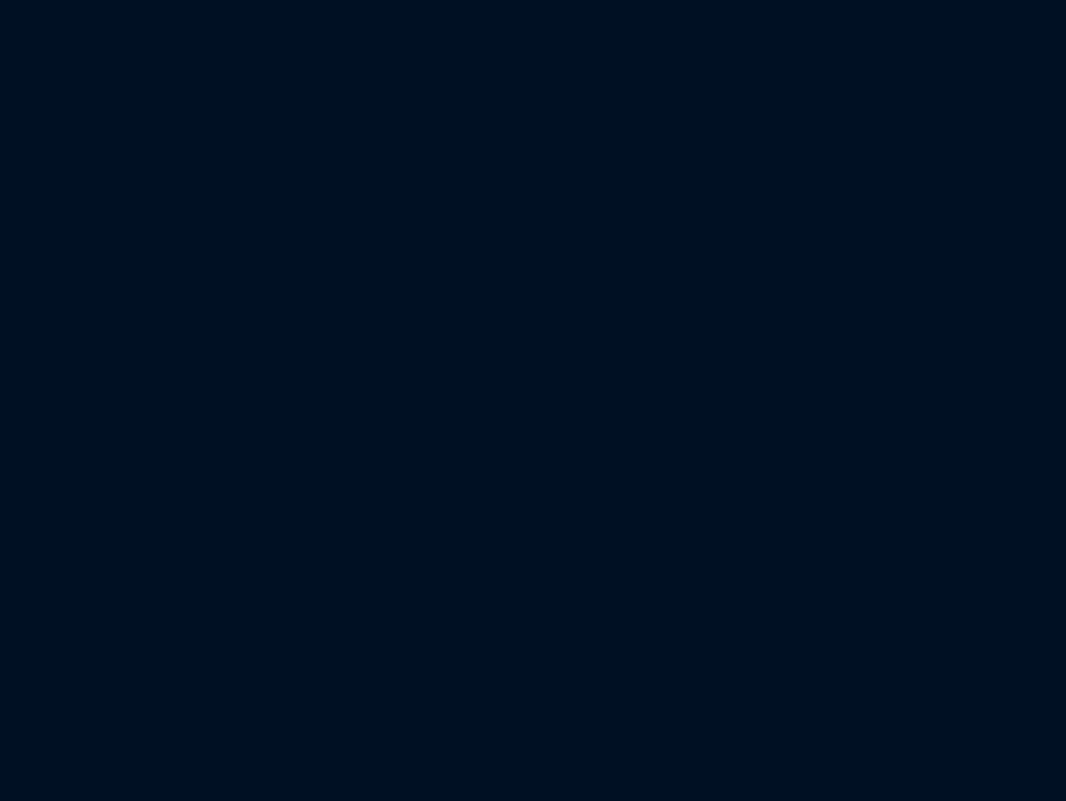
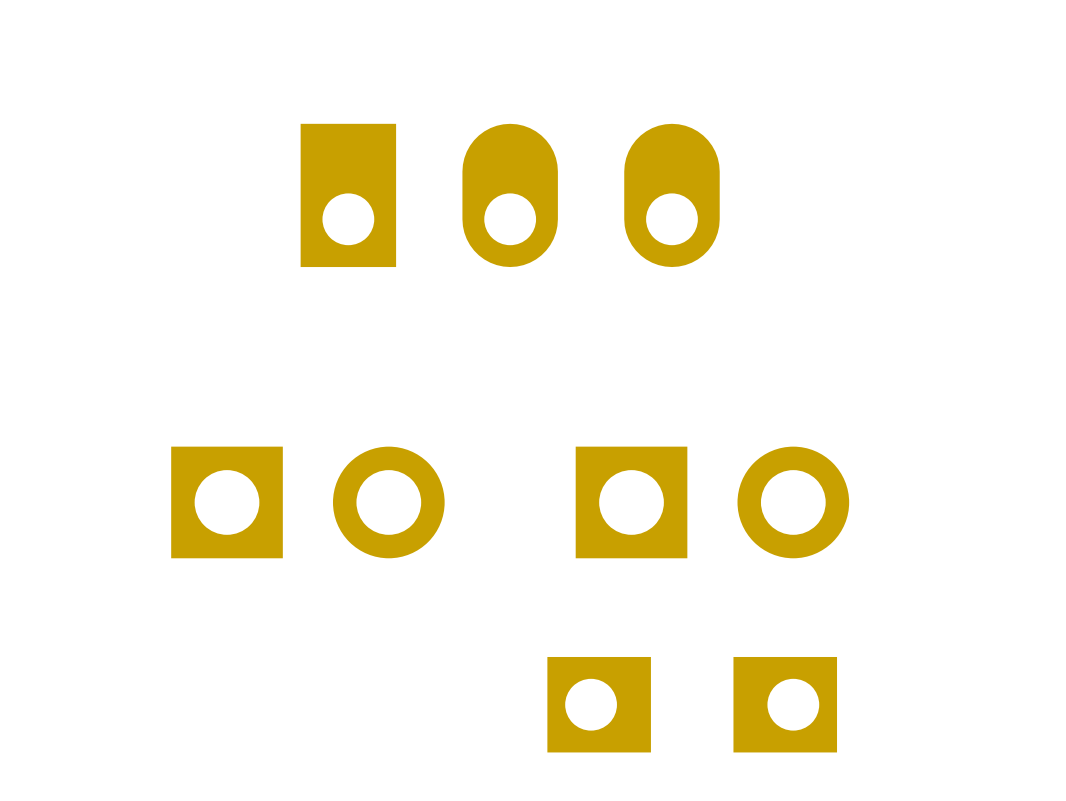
part: none -> (510, 195)
part: none -> (307, 502)
part: none -> (712, 502)
part: none -> (692, 704)

